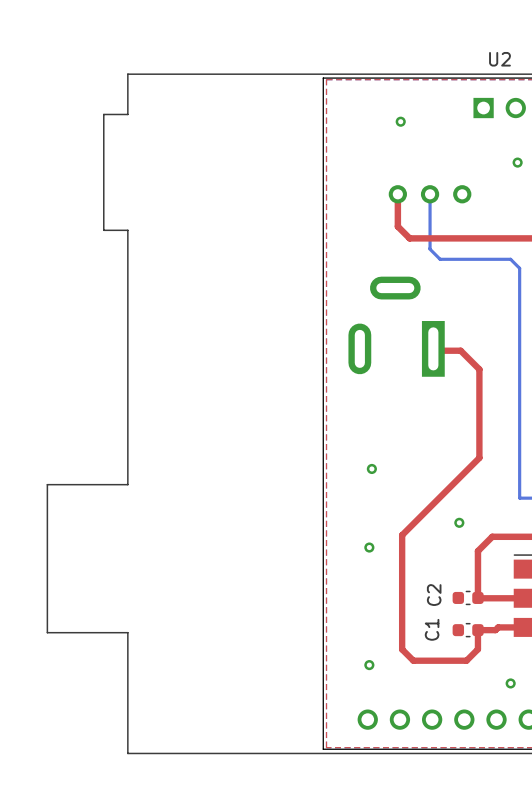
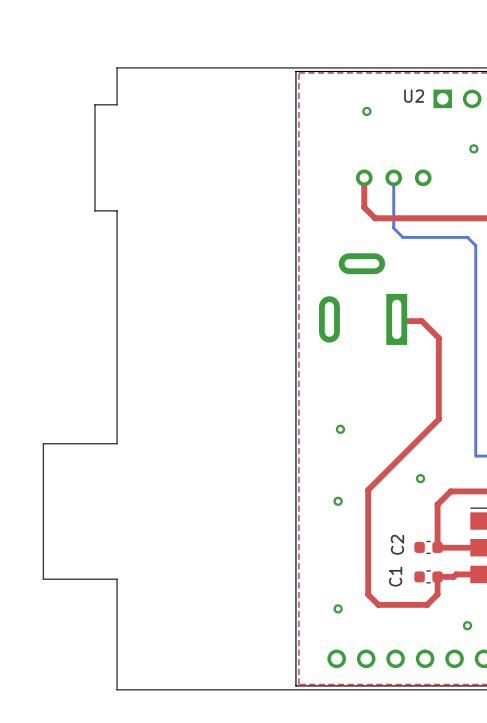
U2 name position: U2 (499, 59) -> U2 (414, 96)

